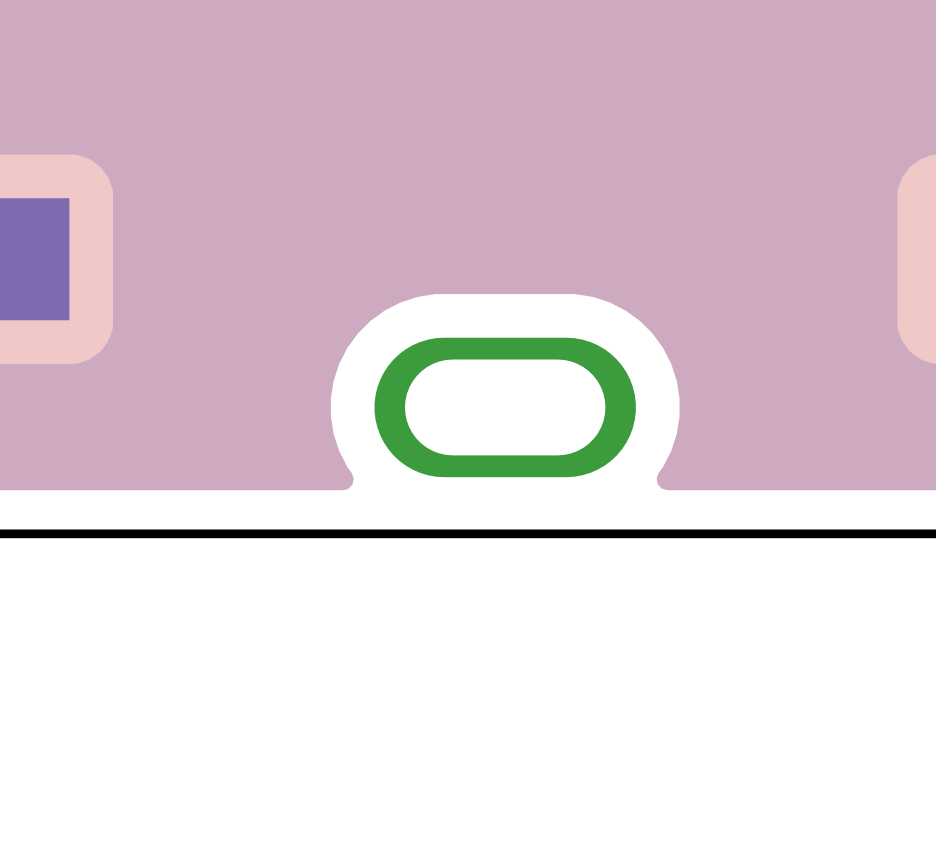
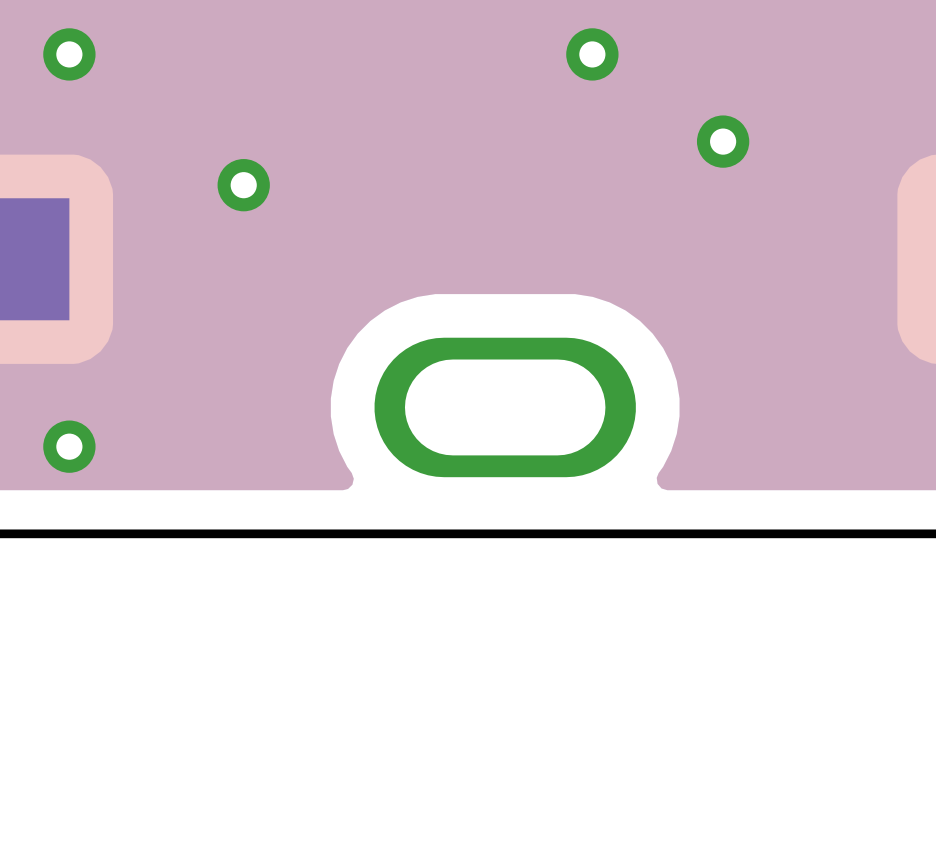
via: none -> (69, 54)
via: none -> (592, 54)
via: none -> (723, 141)
via: none -> (243, 185)
via: none -> (69, 446)

